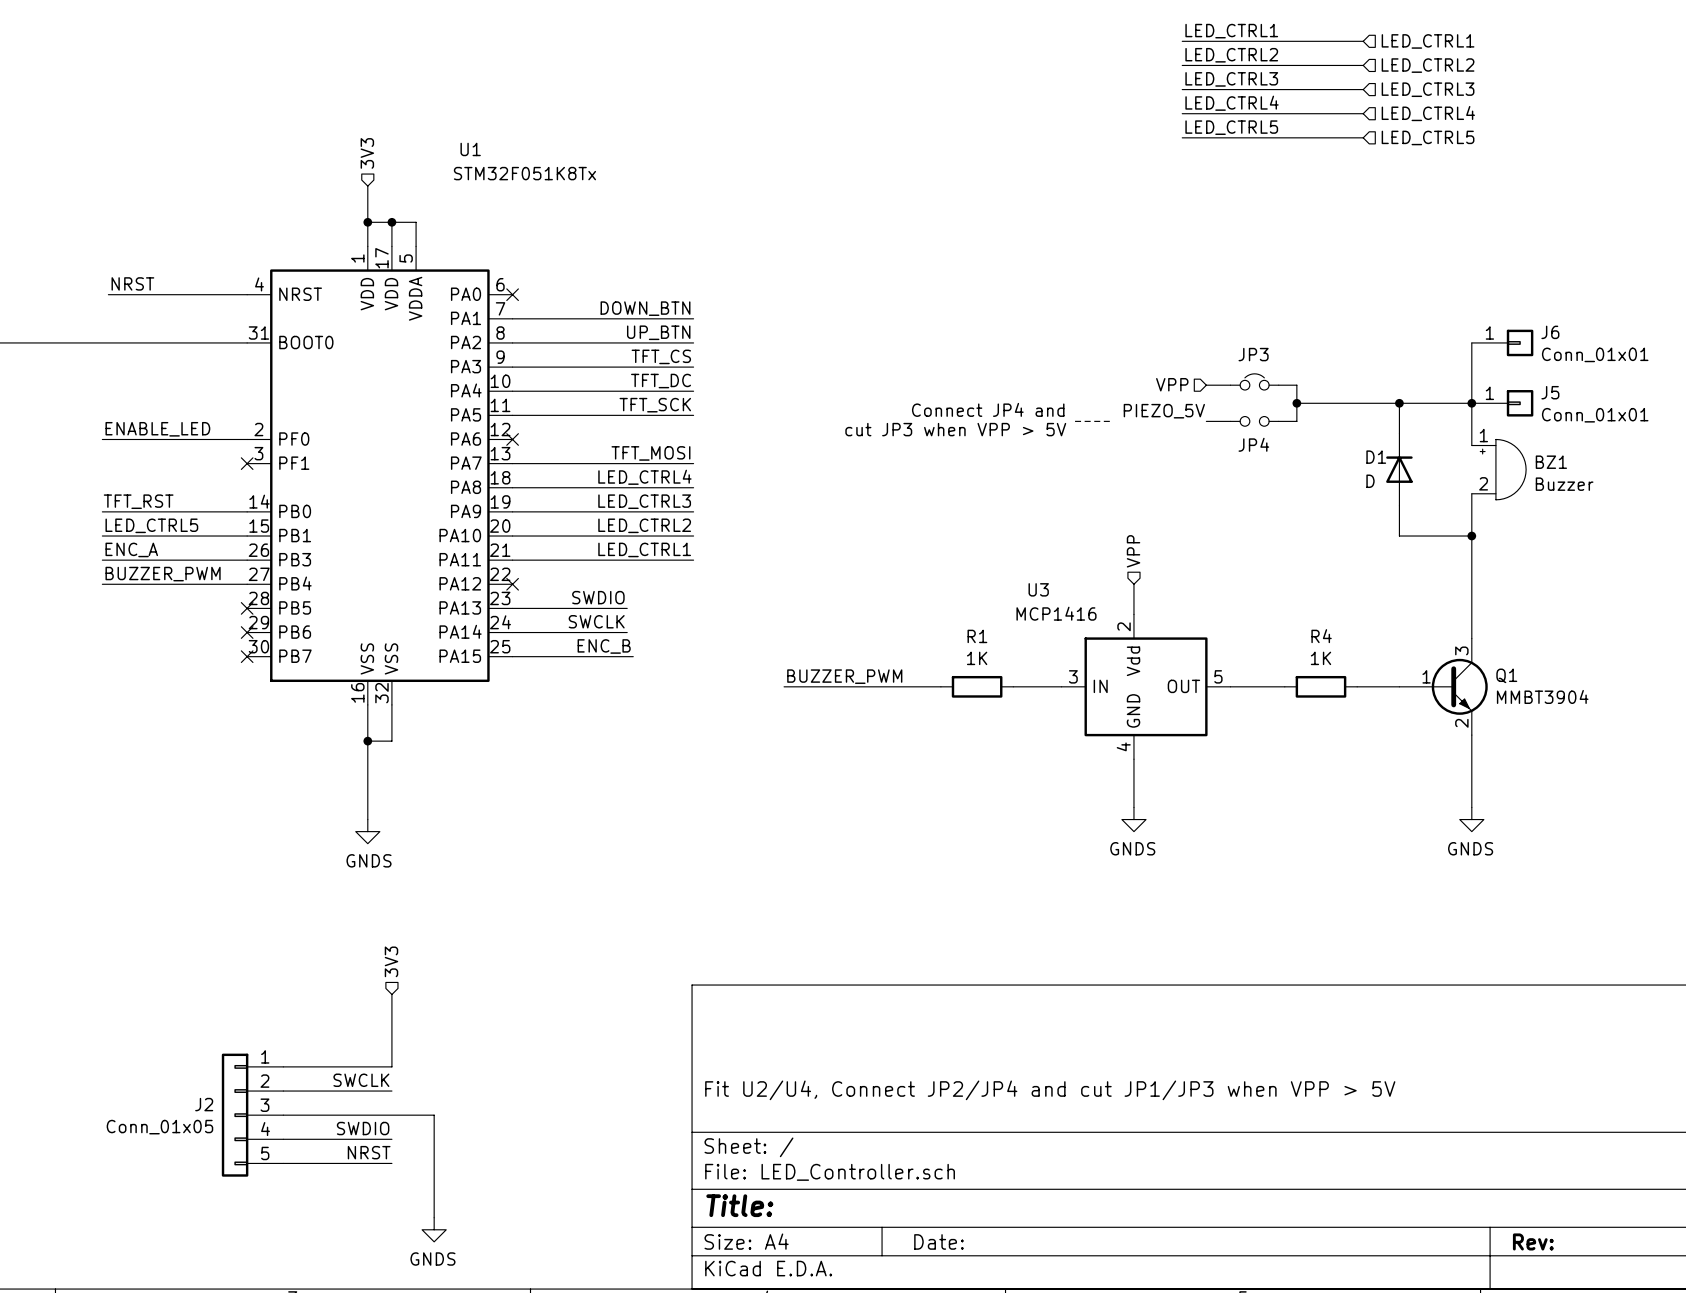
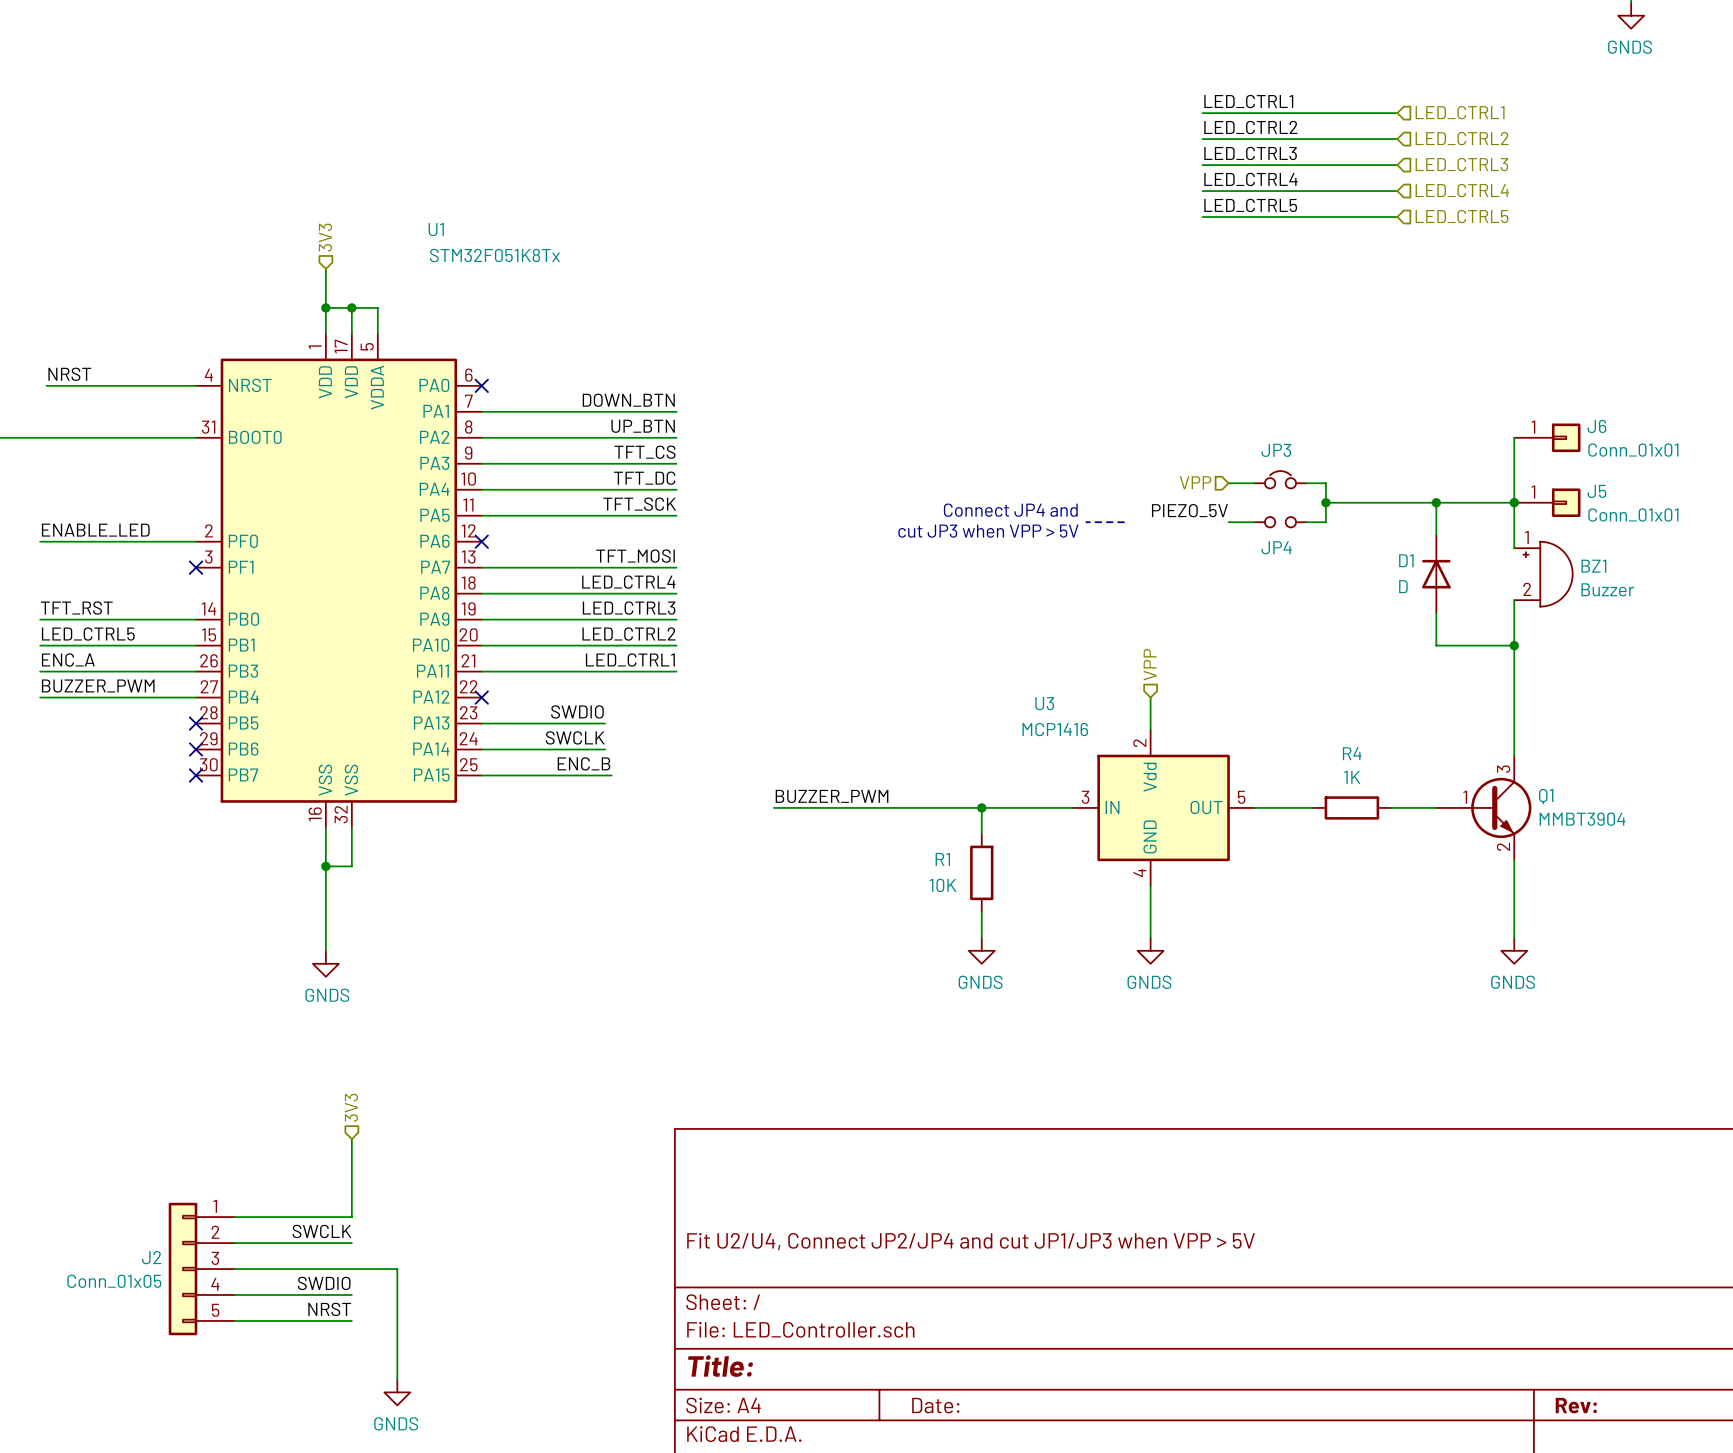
R1 name position: R1 (977, 636) -> R1 (942, 859)
R1 value: 1K (977, 658) -> 10K (943, 885)
wire: none -> (942, 807) (1020, 807)
wire: none -> (981, 807) (981, 833)
R1 rotation: 0° (977, 686) -> 90° clockwise (981, 872)
R1 position: (977, 686) -> (981, 872)
junction: none -> (981, 807)
wire: none -> (981, 911) (981, 937)
power symbol: none -> GNDS (981, 950)

